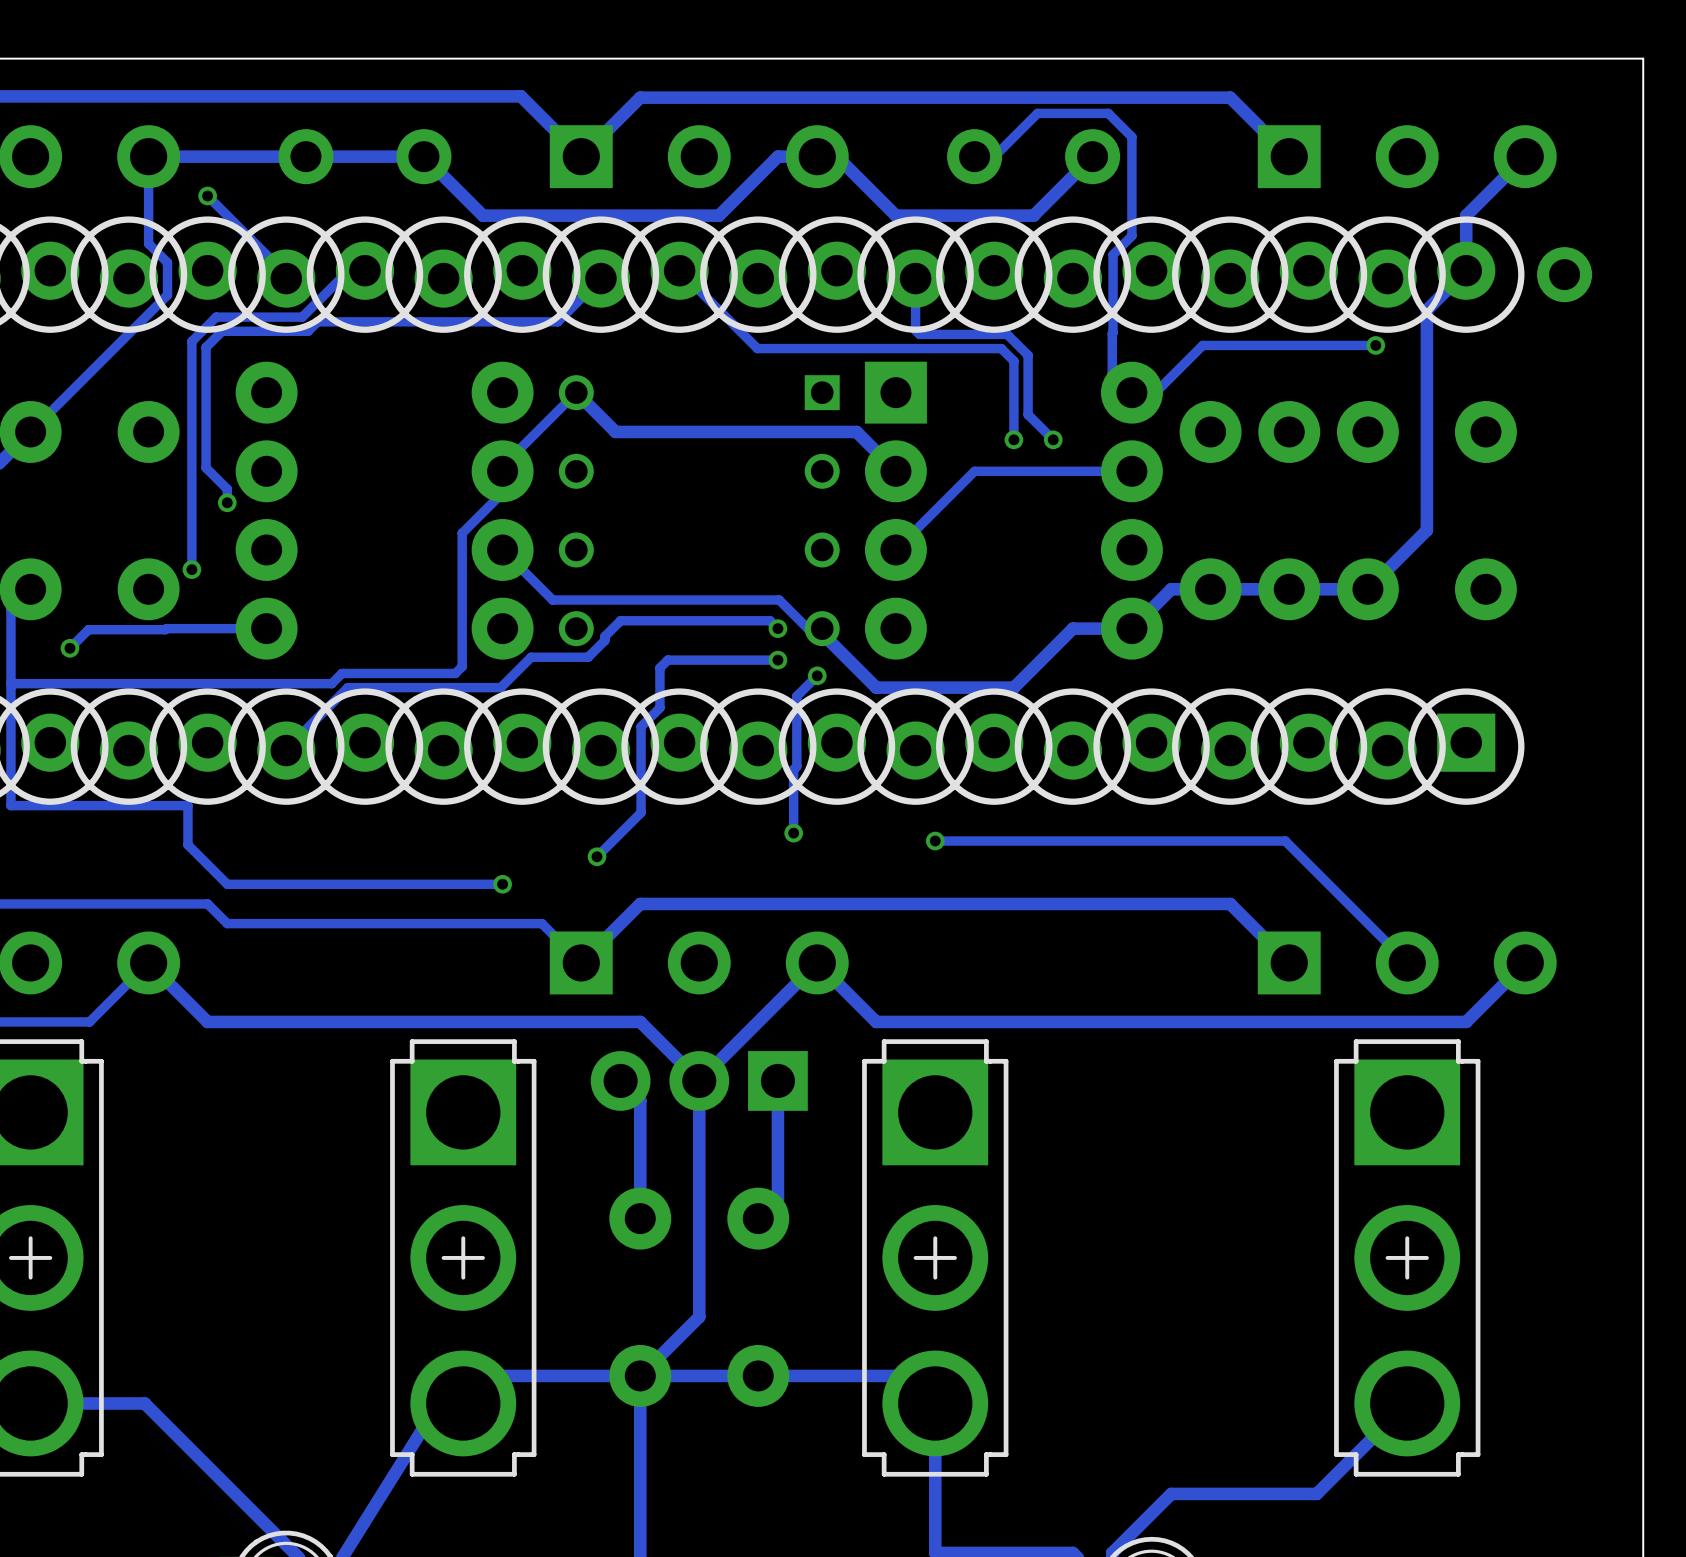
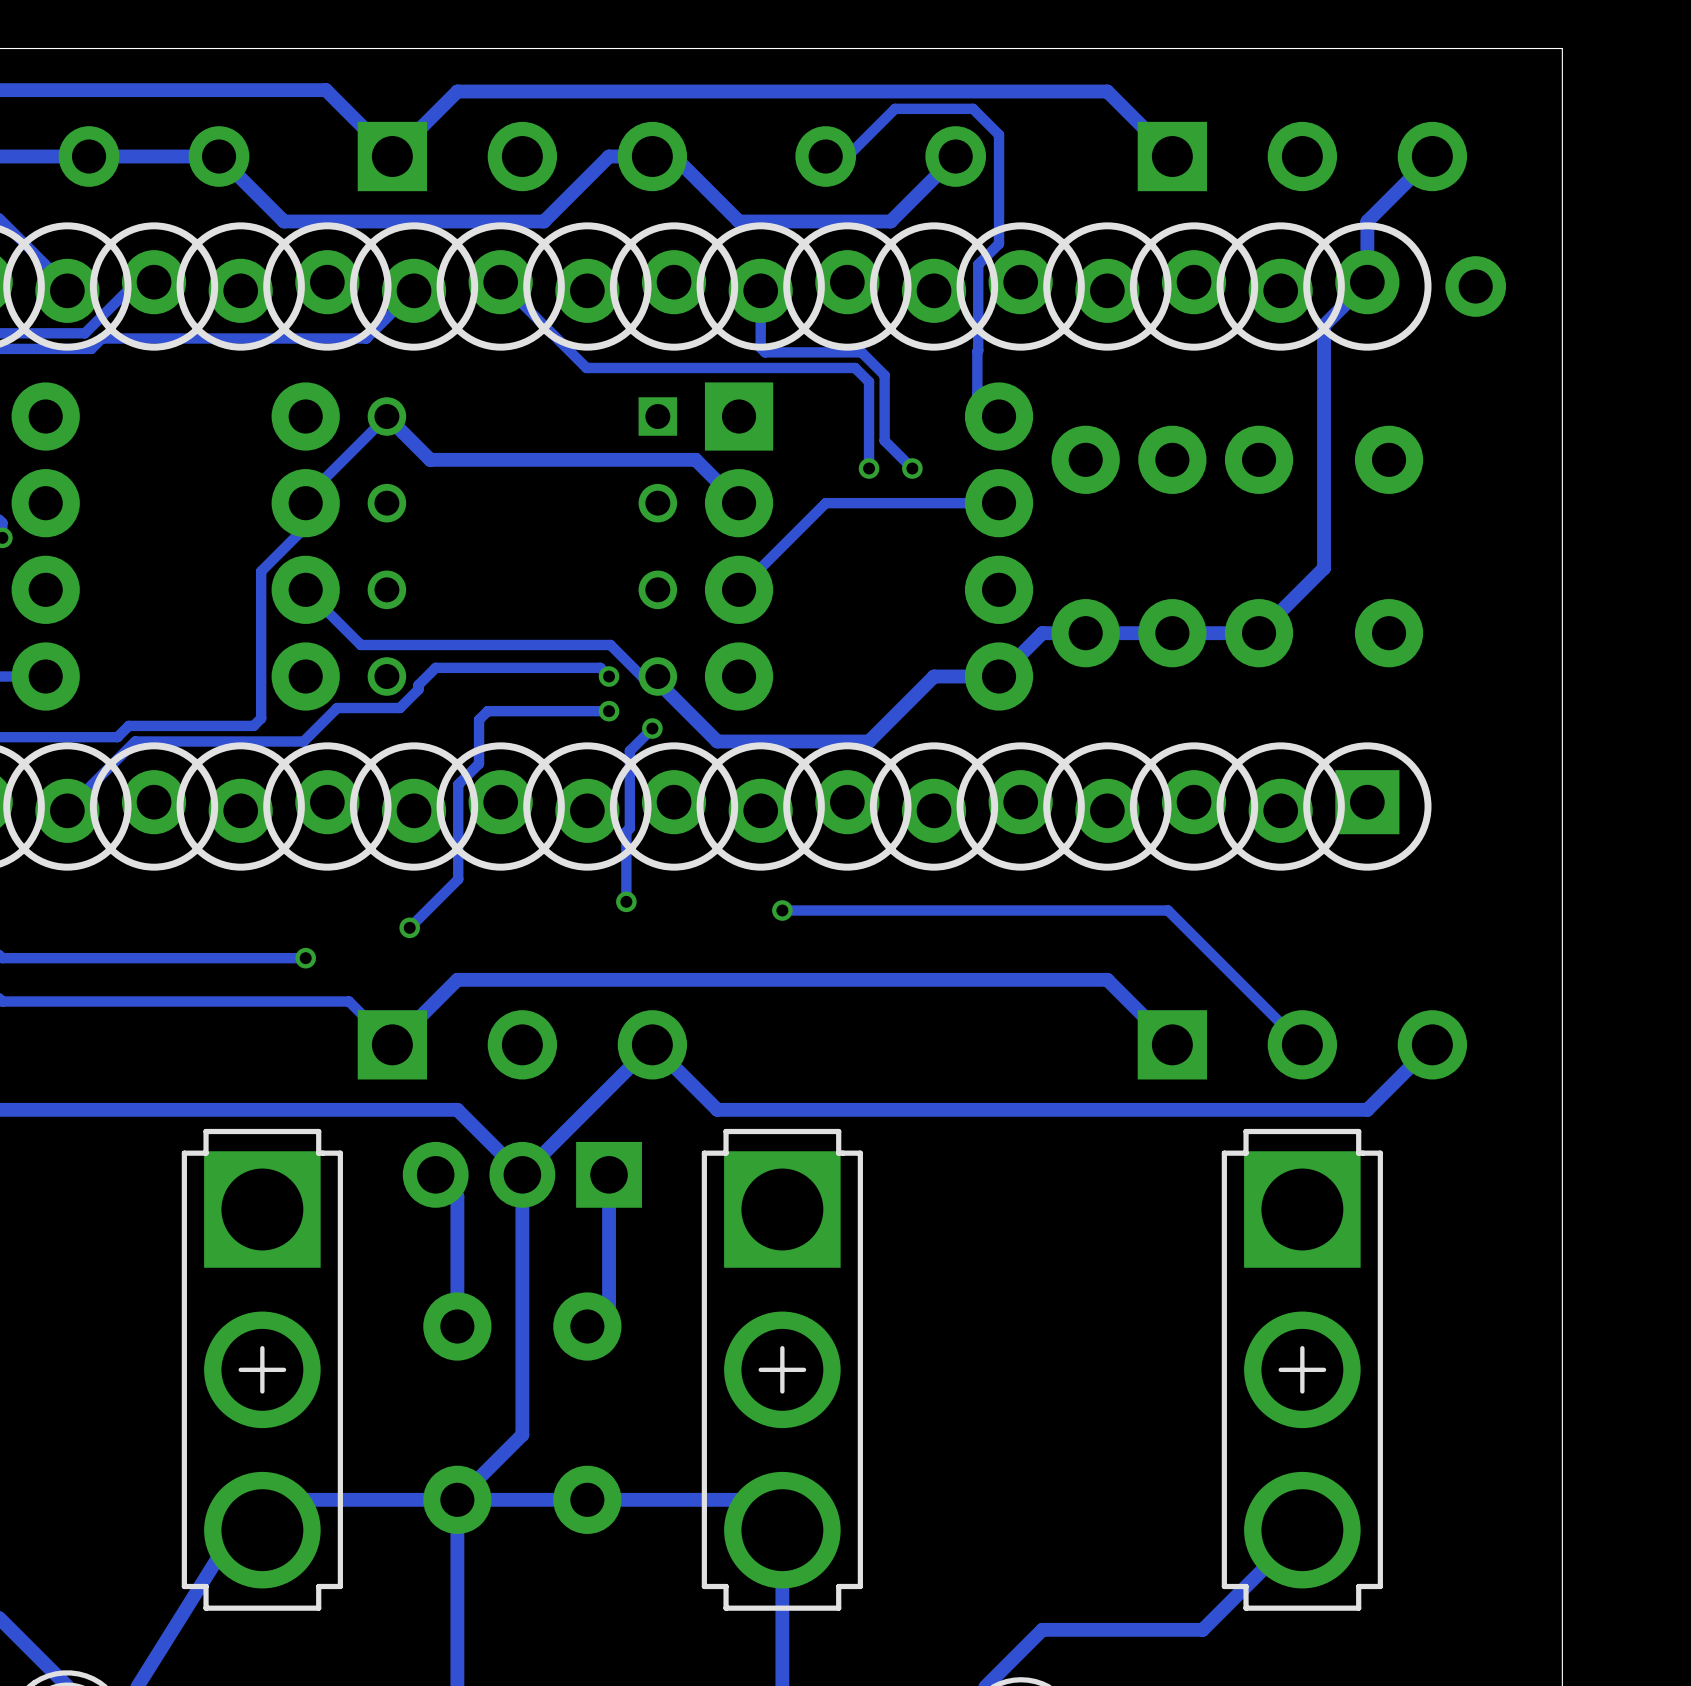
track: (1375, 345) (1202, 345) (1155, 392) (1131, 392) -> none
via: (1375, 345) -> none

